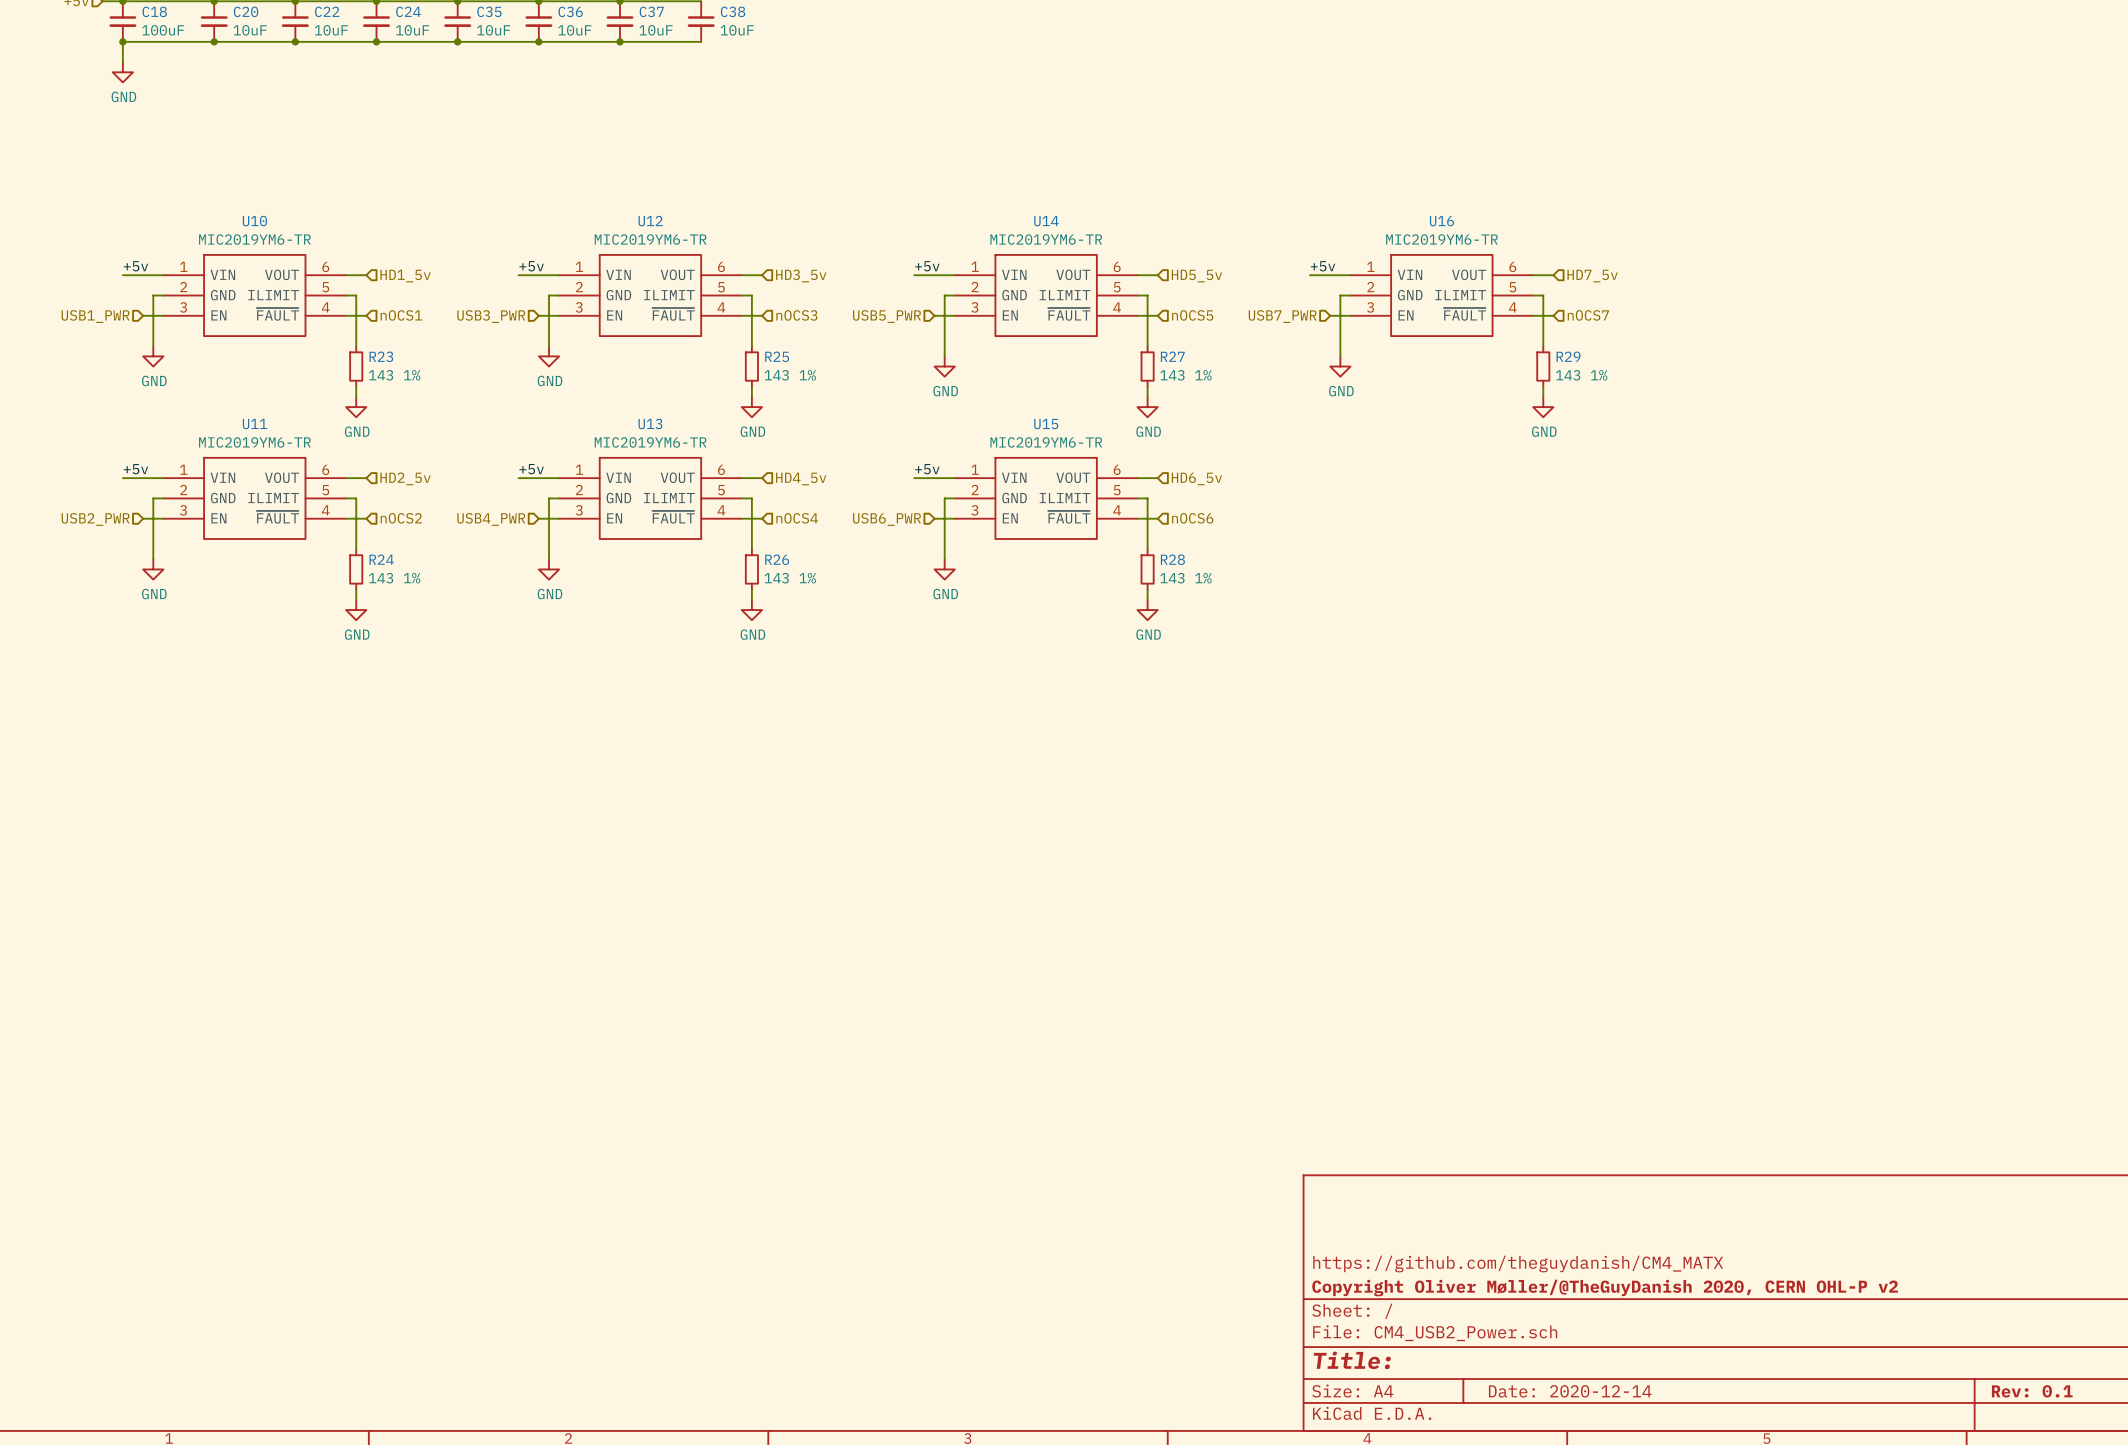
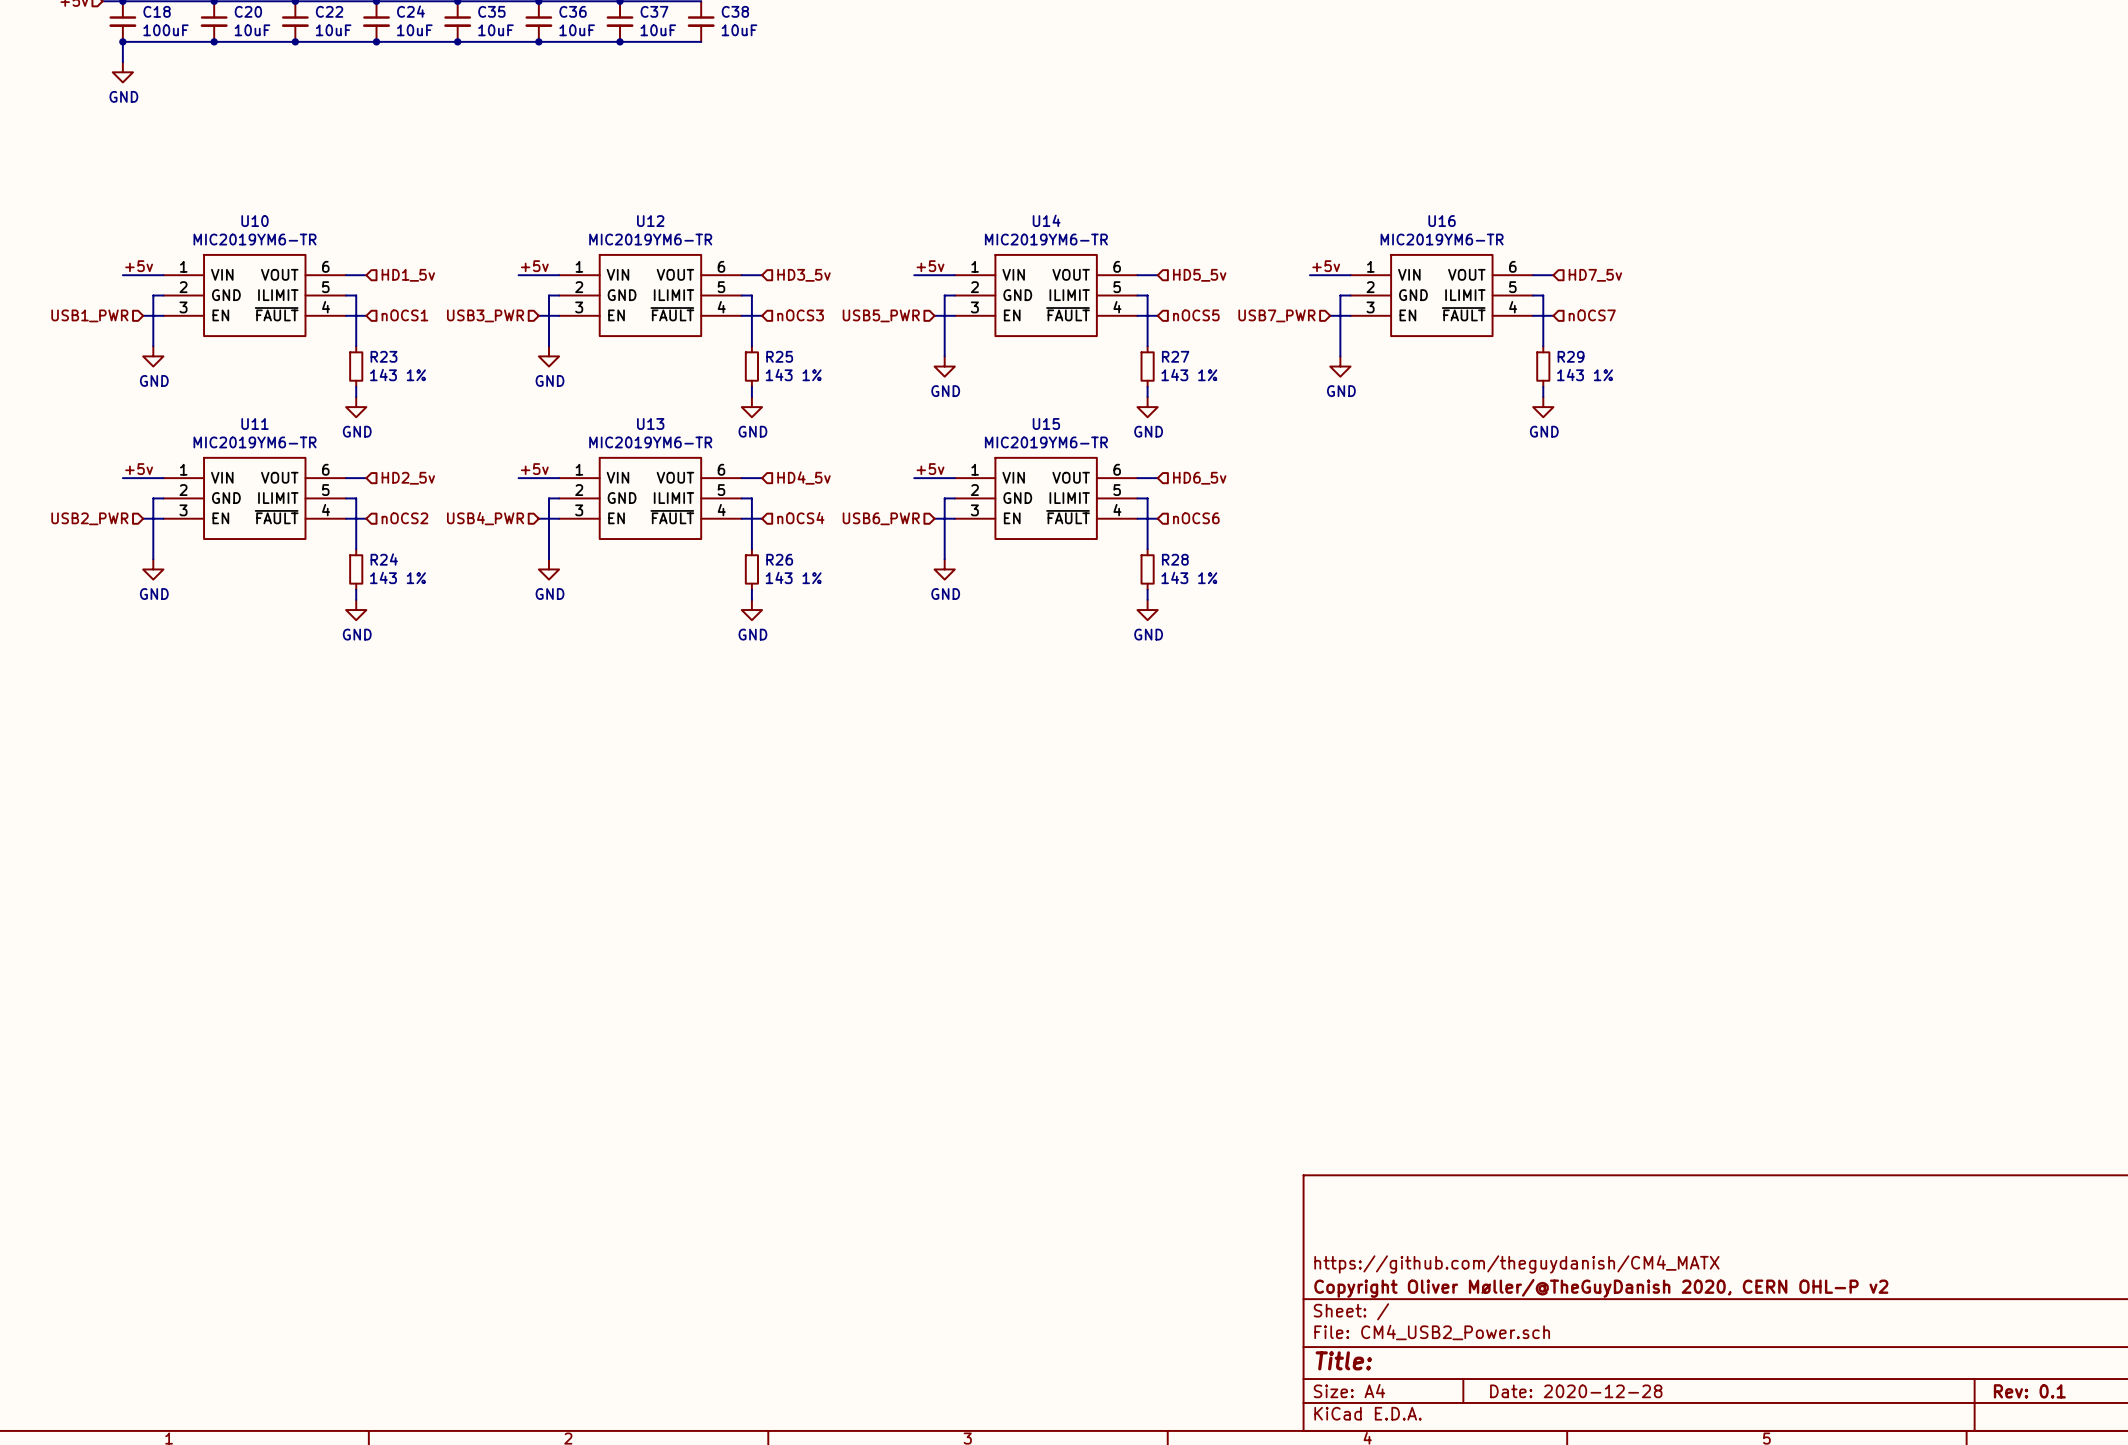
title block: Date: 2020-12-14 (1570, 1391) -> Date: 2020-12-28 (1576, 1391)

